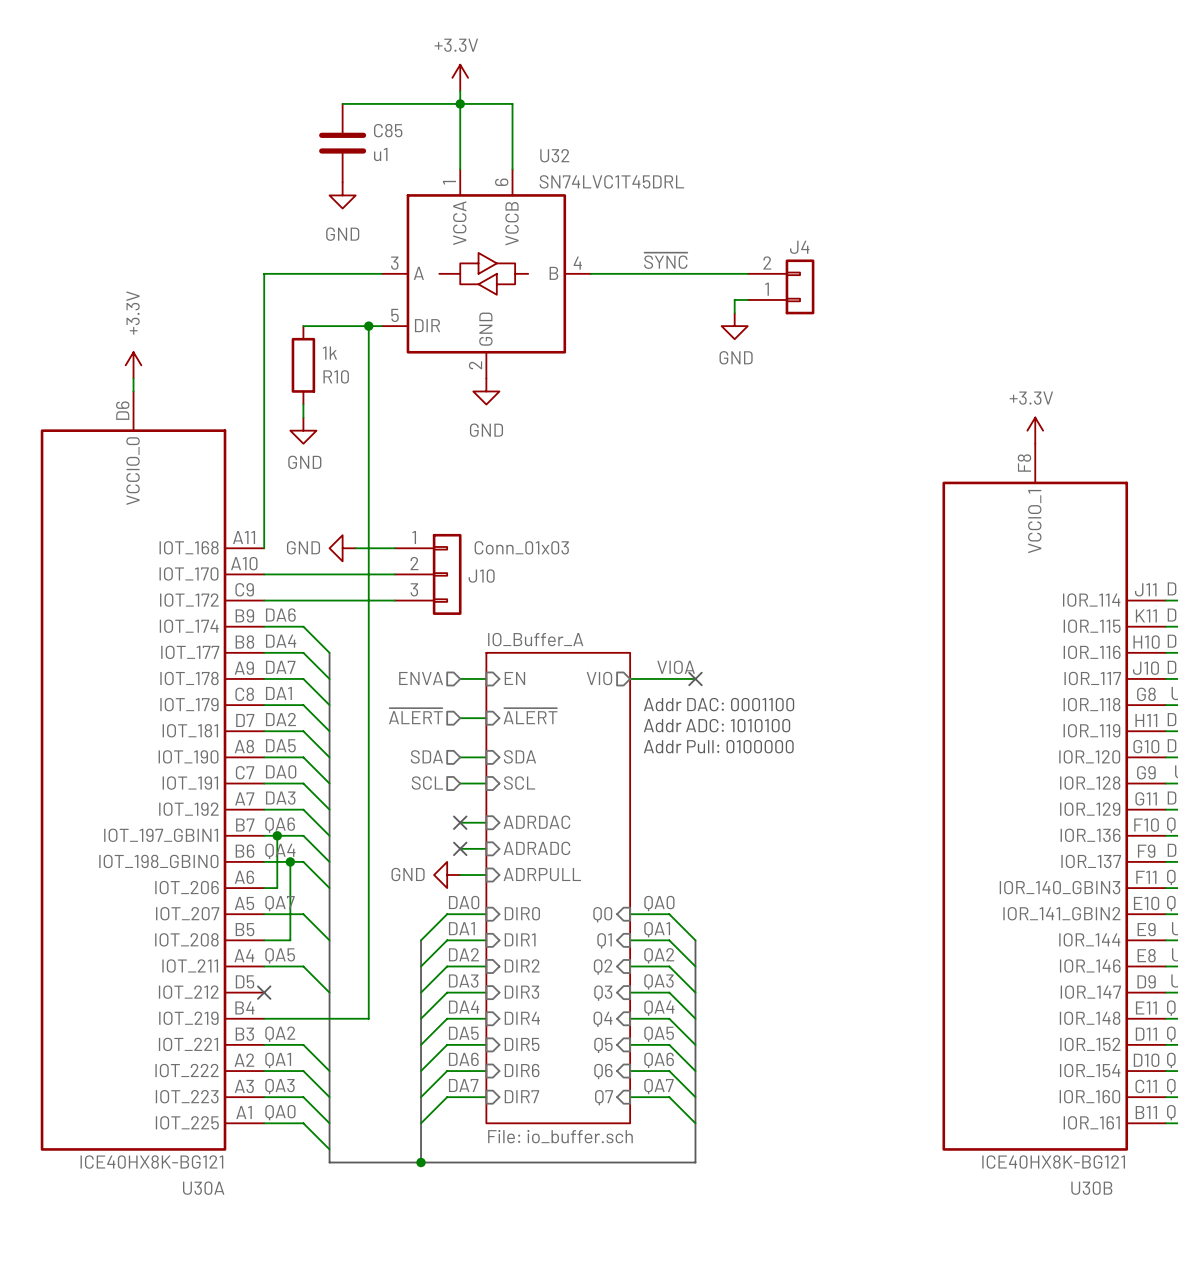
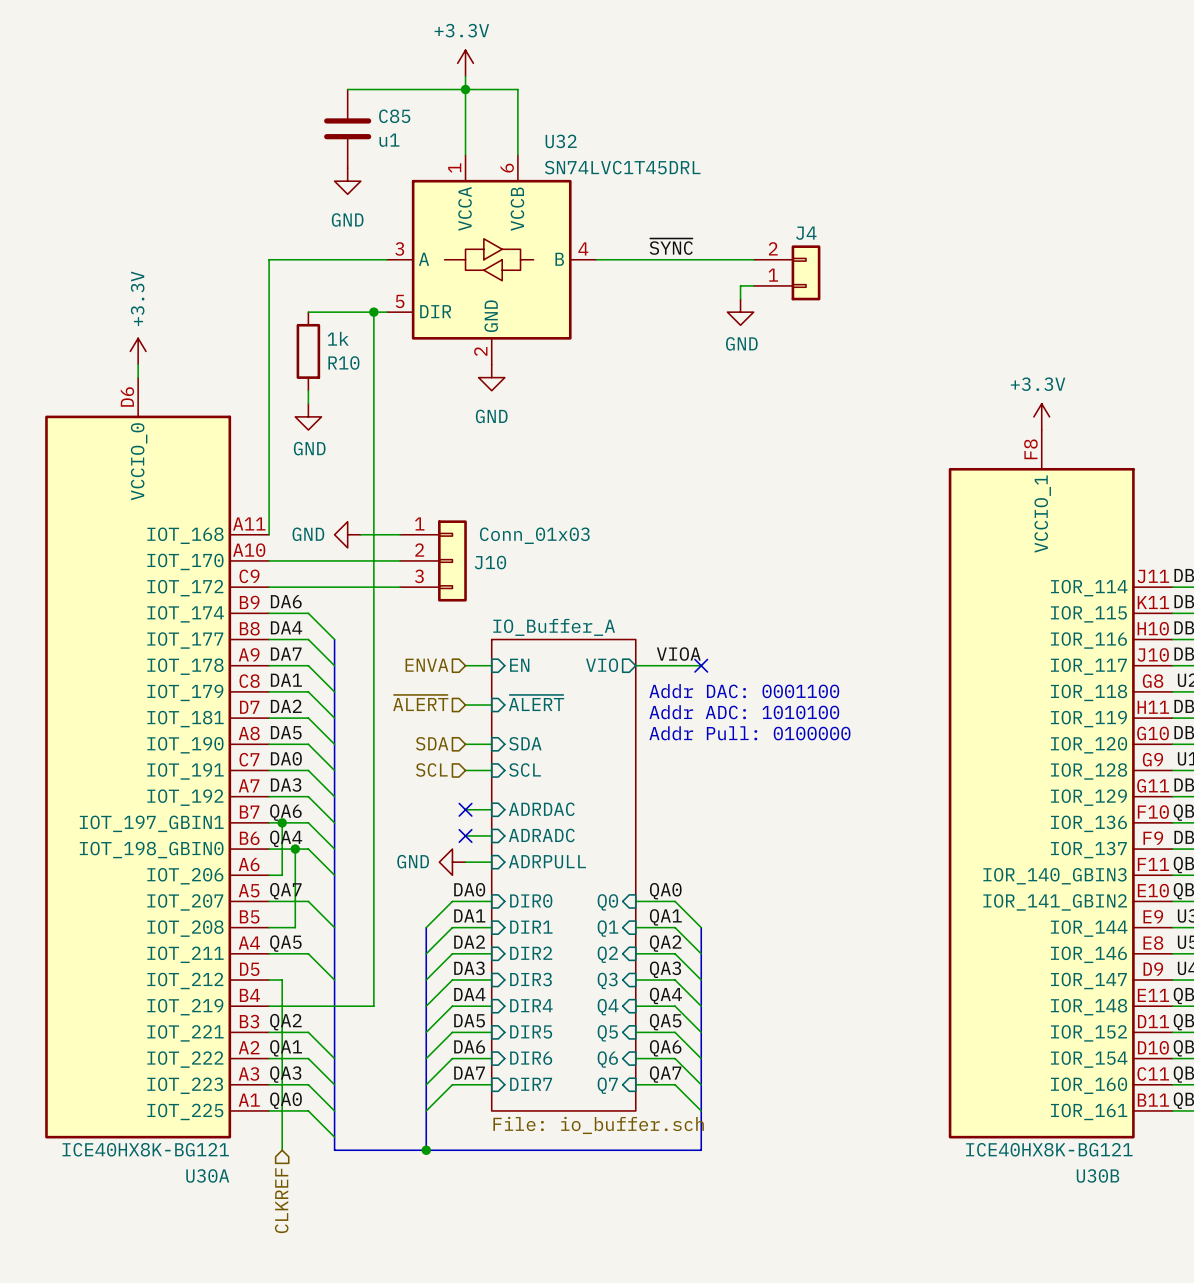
wire: none -> (269, 980) (282, 980) (282, 1150)
no-connect mark: (264, 992) -> none
hierarchical label: none -> CLKREF (281, 1200)

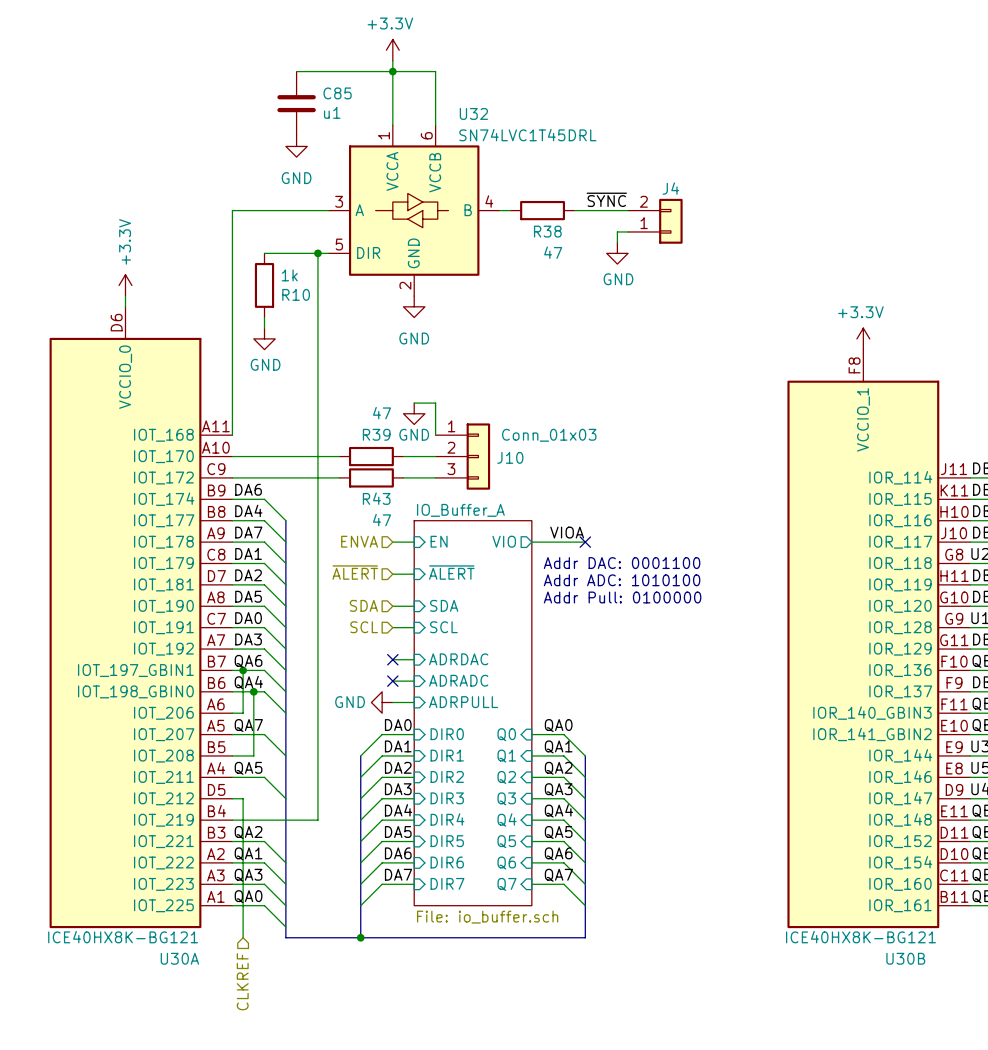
label position: ~{SYNC} (671, 246) -> ~{SYNC} (606, 199)
wire: (609, 259) (688, 259) -> none
R38: none -> 47 (542, 210)
wire: none -> (414, 403) (435, 403) (435, 435)
power symbol rotation: 0° (347, 534) -> 90° counterclockwise (414, 413)
power symbol position: GND (347, 534) -> GND (414, 413)
wire: (360, 534) (400, 534) -> (403, 456) (435, 456)
J10 position: (433, 560) -> (462, 456)
R39: none -> 47 (371, 456)
R43: none -> 47 (371, 477)
wire: none -> (403, 477) (435, 477)

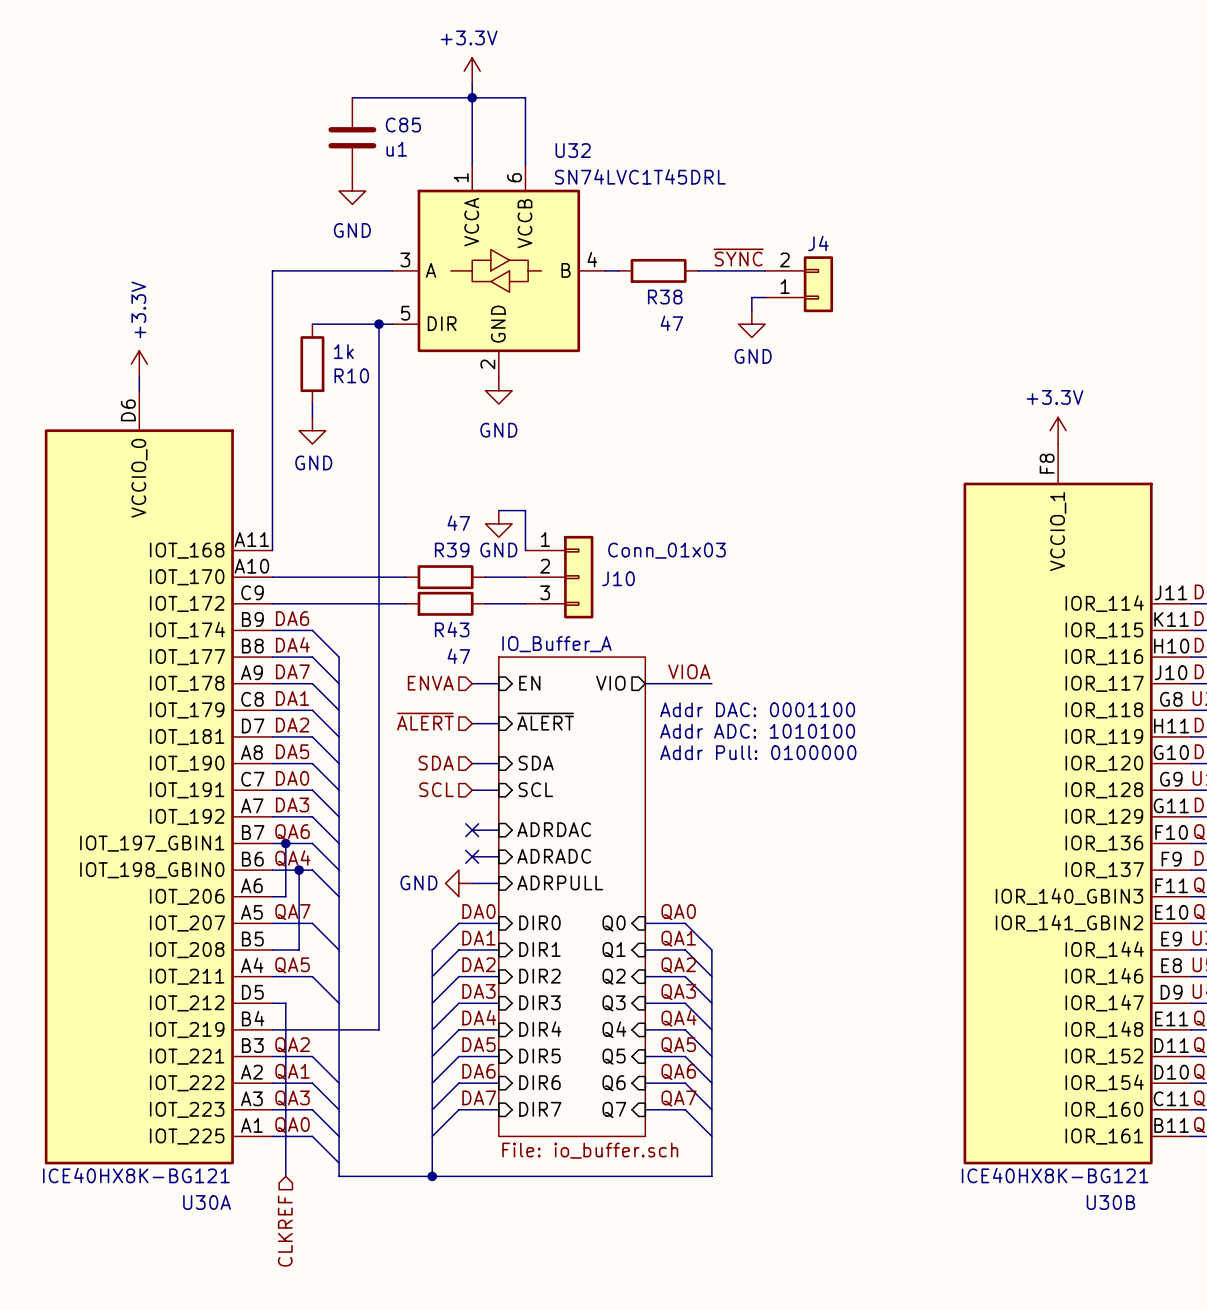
no-connect mark: (585, 542) -> none

